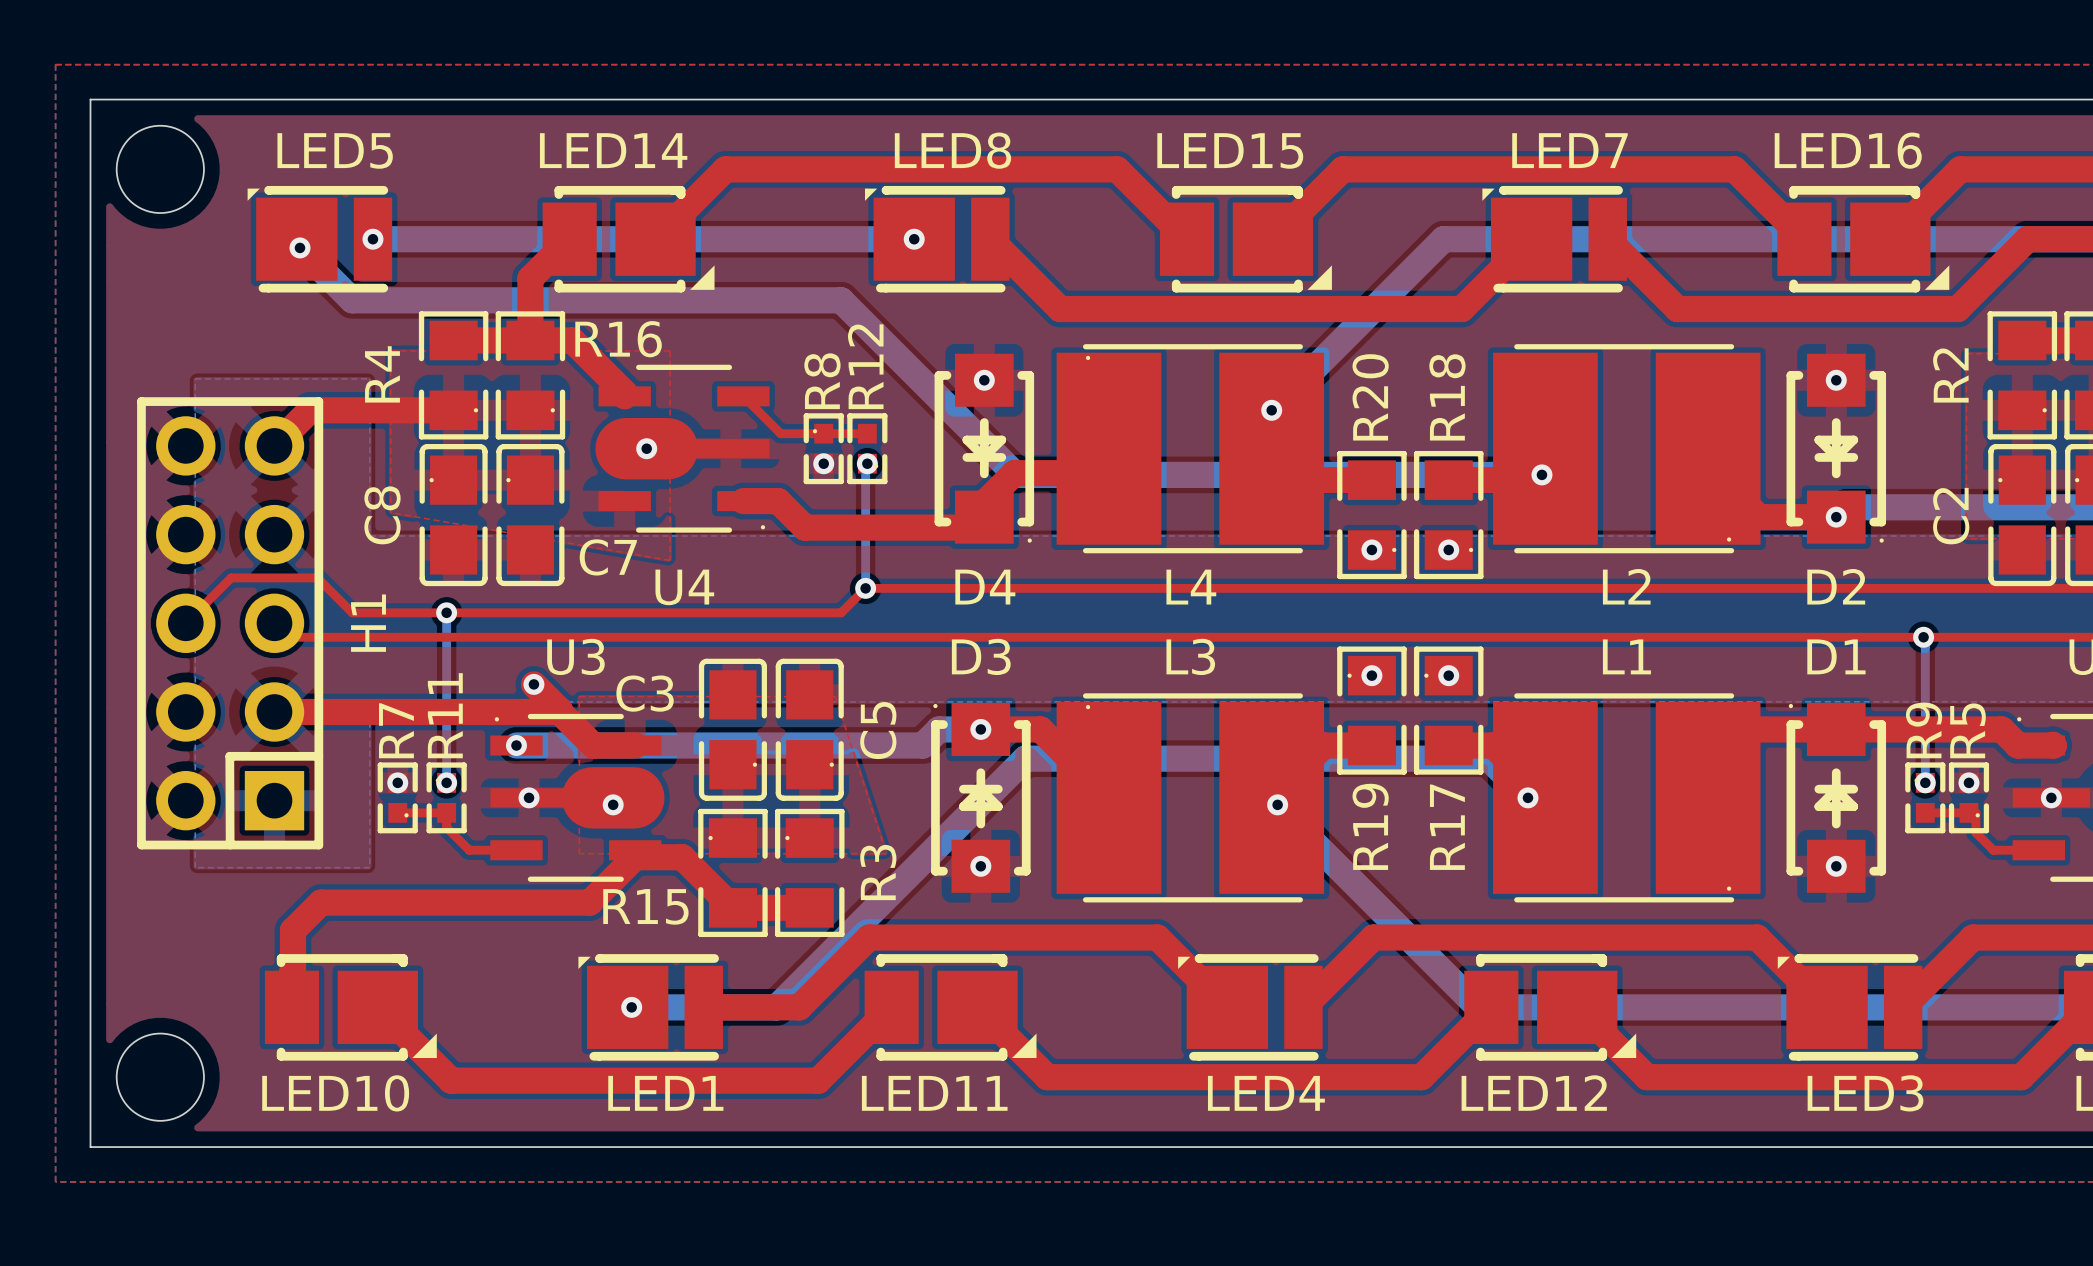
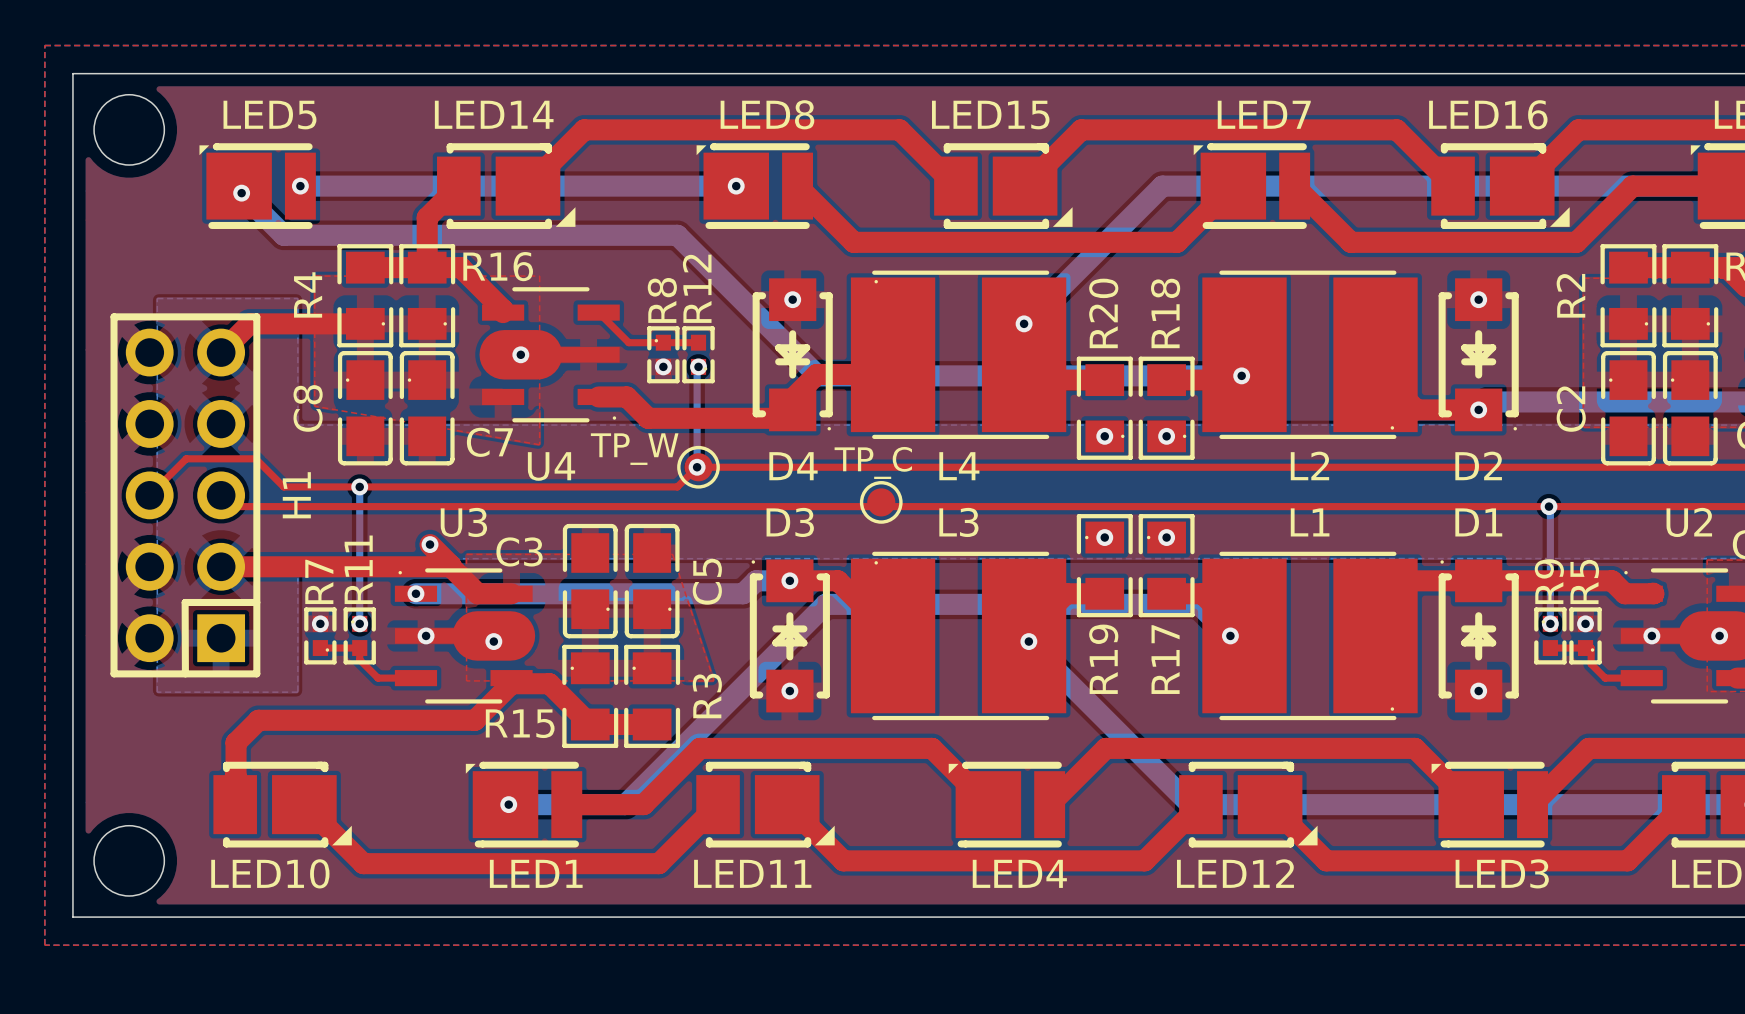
TP_W: none -> (698, 467)
TP_C: none -> (881, 502)

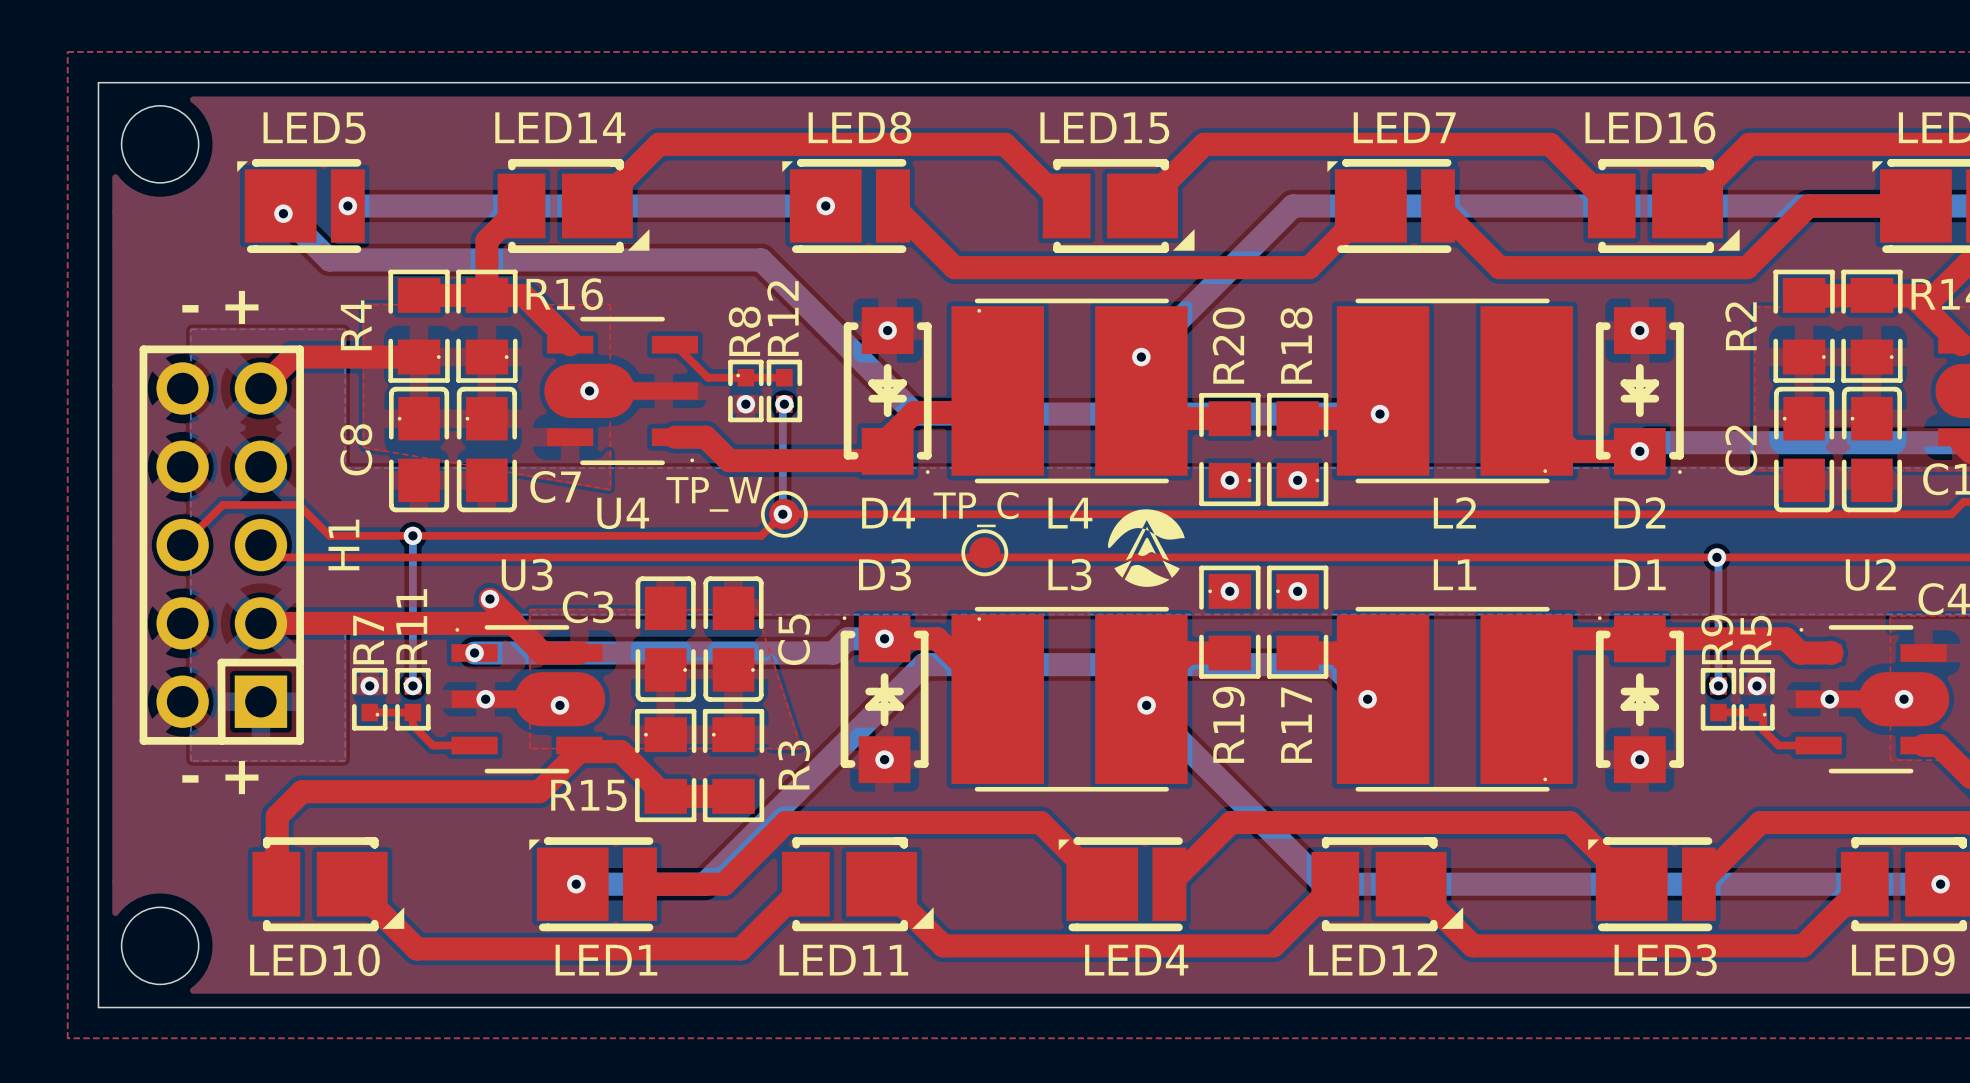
text: none -> - + (220, 307)
drawing: none -> [1107, 509, 1185, 587]
text: none -> - + (220, 777)

